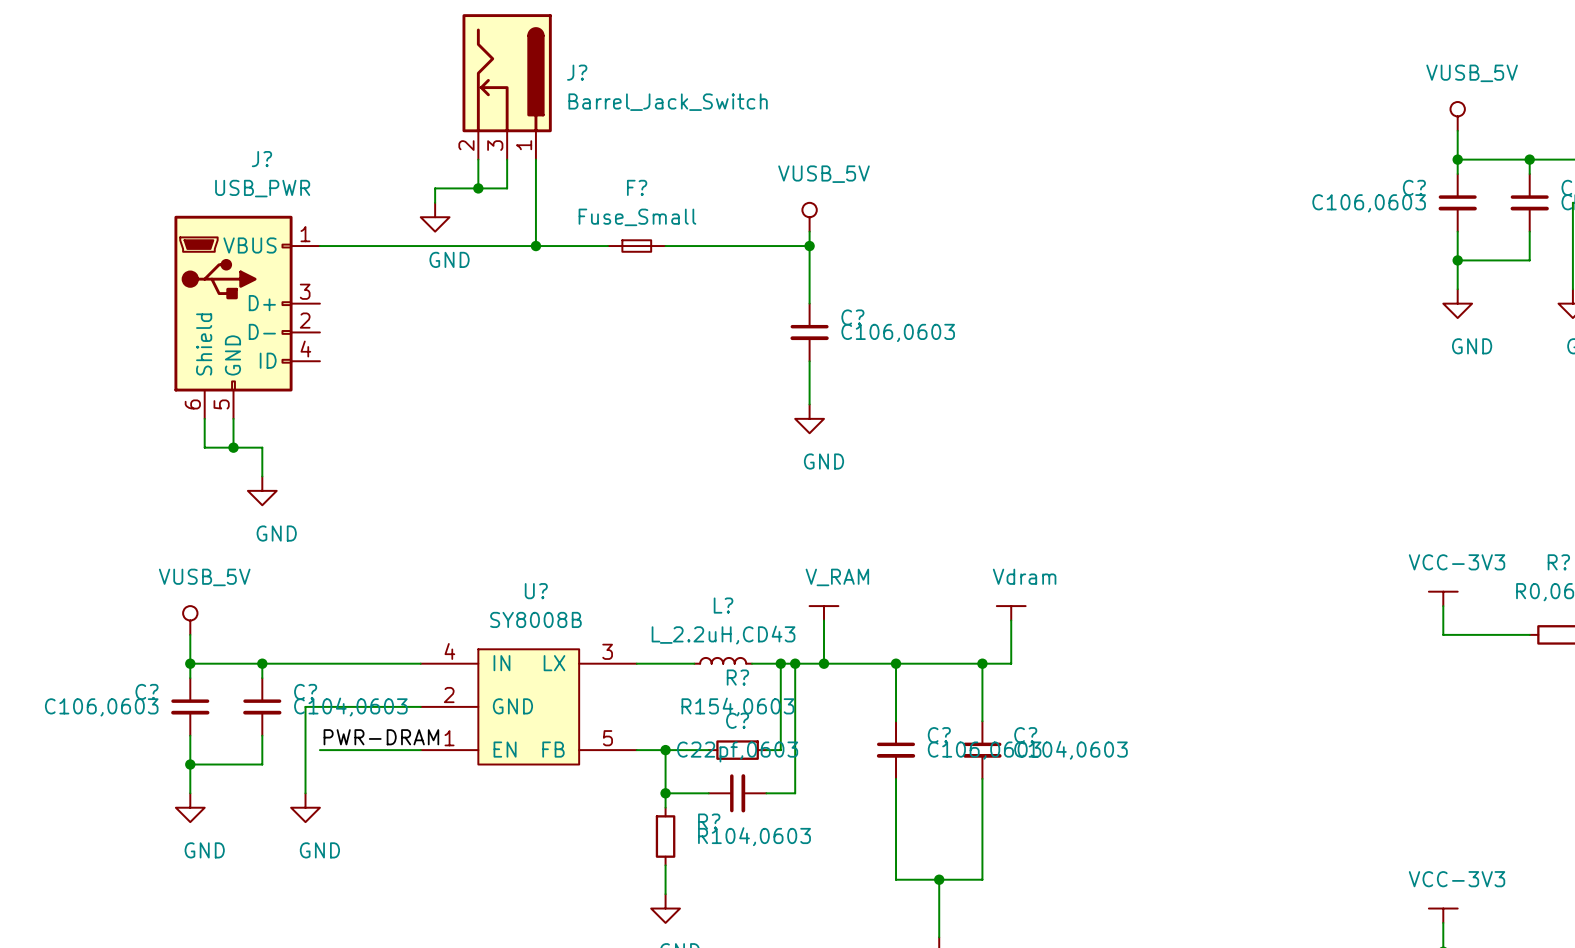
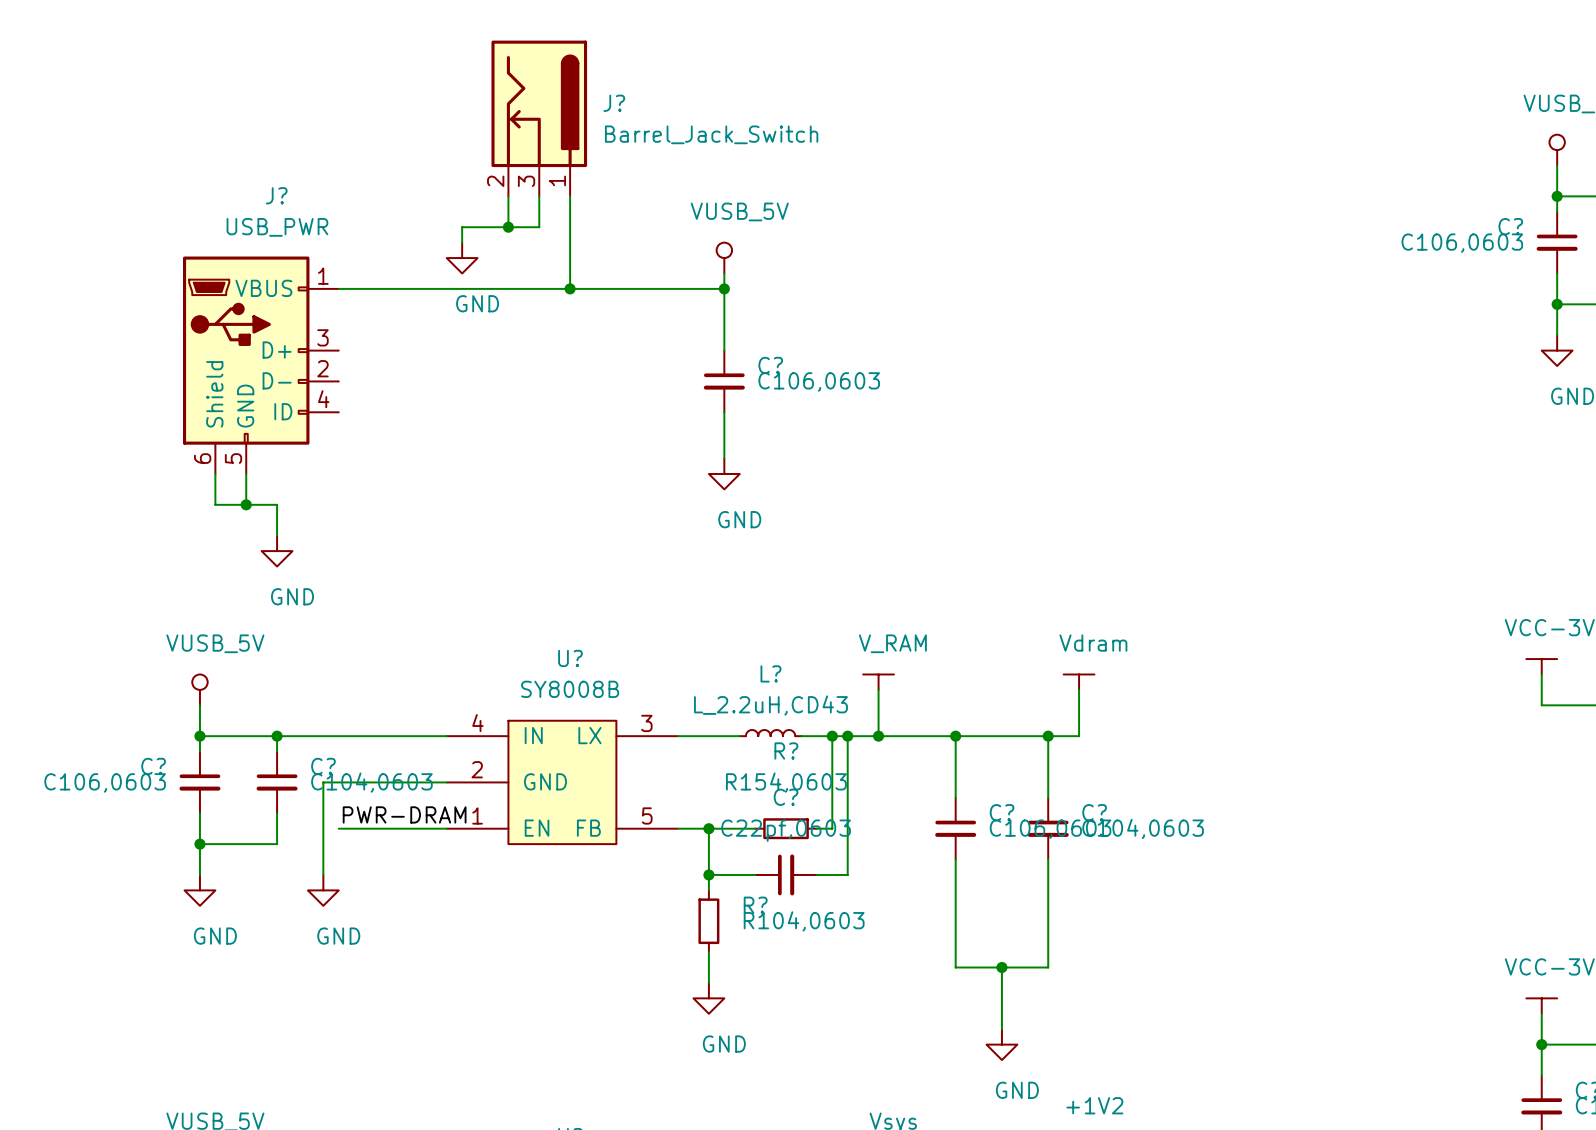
power symbol position: VUSB_5V (809, 217) -> VUSB_5V (724, 258)
wire: (809, 231) (809, 303) -> (724, 273) (724, 350)
F?: Fuse_Small (636, 246) -> none
wire: (679, 246) (809, 246) -> none
junction: none -> (724, 288)
junction: (809, 246) -> none
C? position: (809, 332) -> (724, 381)
wire: (809, 361) (809, 404) -> (724, 412) (724, 458)
power symbol position: GND (809, 418) -> GND (724, 473)

